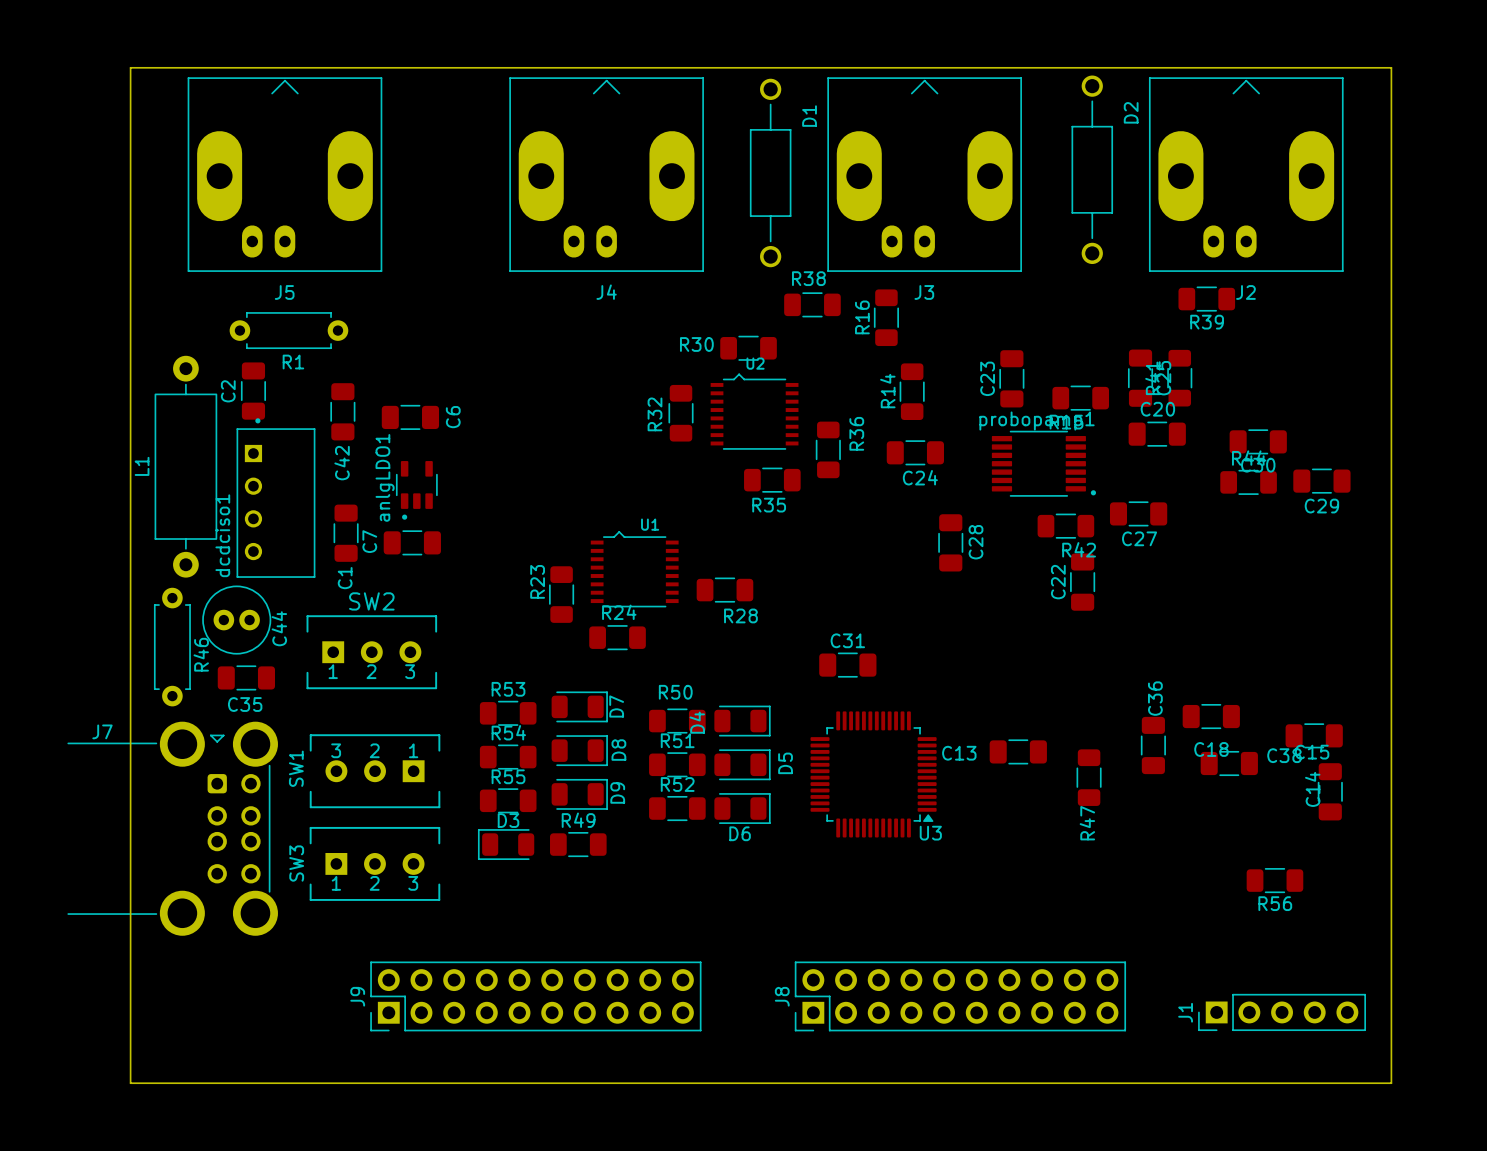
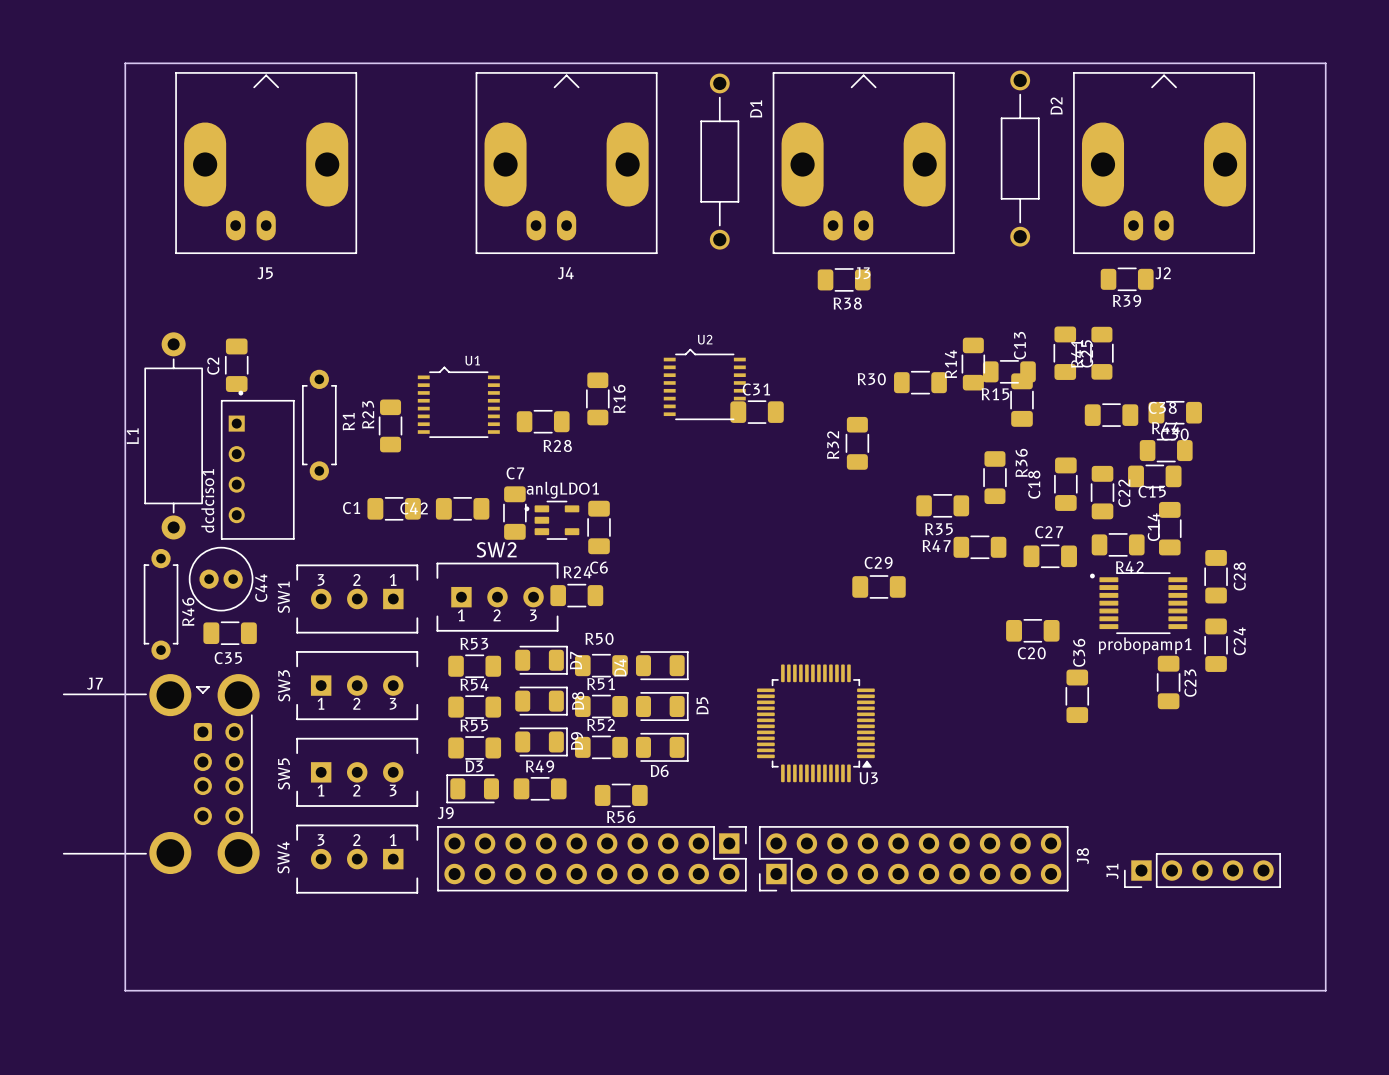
board edge: (134, 67) (130, 67) (130, 1083) (1391, 1083) (1391, 67) -> (125, 63) (125, 990) (1325, 990) (1325, 63) (1299, 63)
R38 name position: R38 (808, 278) -> R38 (847, 303)
R38 position: (812, 304) -> (844, 279)
R16 name position: R16 (862, 317) -> R16 (619, 398)
R16 position: (886, 317) -> (597, 398)
R1 rotation: 0° (288, 330) -> 90° clockwise (319, 425)
R1 position: (288, 330) -> (319, 425)
R30 position: (748, 348) -> (920, 382)
R1 name position: R1 (293, 362) -> R1 (348, 421)
C23 name position: C23 (987, 378) -> C23 (1190, 683)
C23 position: (1011, 378) -> (1168, 682)
R14 position: (912, 391) -> (973, 364)
C20 name position: C20 (1157, 409) -> C20 (1031, 653)
C42 rotation: 0° (342, 411) -> 90° clockwise (462, 508)
C42 position: (342, 411) -> (462, 508)
R32 position: (681, 413) -> (857, 443)
C6 rotation: 0° (410, 417) -> 90° clockwise (599, 527)
C6 position: (410, 417) -> (599, 527)
C20 position: (1157, 434) -> (1032, 630)
R36 position: (828, 449) -> (994, 477)
C24 rotation: 0° (915, 452) -> 90° clockwise (1216, 645)
C24 position: (915, 452) -> (1216, 645)
probopamp1 rotation: 0° (1043, 463) -> 180° (1138, 603)
probopamp1 position: (1043, 463) -> (1138, 603)
C24 name position: C24 (920, 477) -> C24 (1239, 641)
R35 position: (772, 480) -> (942, 505)
C29 position: (1321, 481) -> (879, 586)
anlgLDO1 rotation: 0° (416, 490) -> 90° clockwise (551, 520)
anlgLDO1 position: (416, 490) -> (551, 520)
C29 name position: C29 (1321, 506) -> C29 (878, 562)
C27 position: (1138, 513) -> (1050, 556)
R42 position: (1065, 526) -> (1118, 544)
C1 rotation: 0° (346, 533) -> 90° clockwise (394, 508)
C1 position: (346, 533) -> (394, 508)
C27 name position: C27 (1139, 538) -> C27 (1049, 532)
C7 rotation: 0° (412, 542) -> 90° clockwise (514, 513)
C7 position: (412, 542) -> (514, 513)
C28 position: (950, 542) -> (1216, 576)
U1 position: (634, 569) -> (458, 402)
C22 name position: C22 (1058, 582) -> C22 (1124, 493)
C22 position: (1082, 582) -> (1102, 492)
R28 position: (724, 590) -> (543, 421)
R23 position: (561, 594) -> (390, 425)
SW2 position: (371, 652) -> (497, 597)
C31 position: (847, 665) -> (757, 412)
C18 rotation: 0° (1211, 716) -> 90° clockwise (1065, 484)
C18 position: (1211, 716) -> (1065, 484)
R50 position: (677, 721) -> (601, 665)
D4 position: (742, 721) -> (662, 665)
C15 position: (1314, 735) -> (1154, 476)
C13 rotation: 0° (1018, 751) -> 90° clockwise (1022, 400)
C13 position: (1018, 751) -> (1022, 400)
C38 position: (1229, 763) -> (1111, 415)
R51 position: (677, 764) -> (601, 706)
D5 position: (742, 764) -> (662, 706)
SW1 position: (375, 771) -> (357, 599)
R47 rotation: 0° (1089, 777) -> 90° clockwise (979, 547)
R47 position: (1089, 777) -> (979, 547)
C14 position: (1330, 791) -> (1169, 528)
R52 position: (677, 808) -> (601, 747)
D6 position: (742, 808) -> (662, 747)
SW5: none -> (357, 772)
SW3 position: (374, 863) -> (357, 685)
R56 position: (1274, 880) -> (621, 795)
SW4: none -> (357, 859)
J9 name rotation: 0° (357, 996) -> 90° clockwise (445, 813)
J9 name position: J9 (357, 996) -> J9 (445, 813)
J9 position: (535, 996) -> (913, 858)
J8 name position: J8 (782, 996) -> J8 (1082, 856)
J8 rotation: 0° (960, 996) -> 180° (591, 858)
J8 position: (960, 996) -> (591, 858)
J1 position: (1282, 1012) -> (1202, 870)

